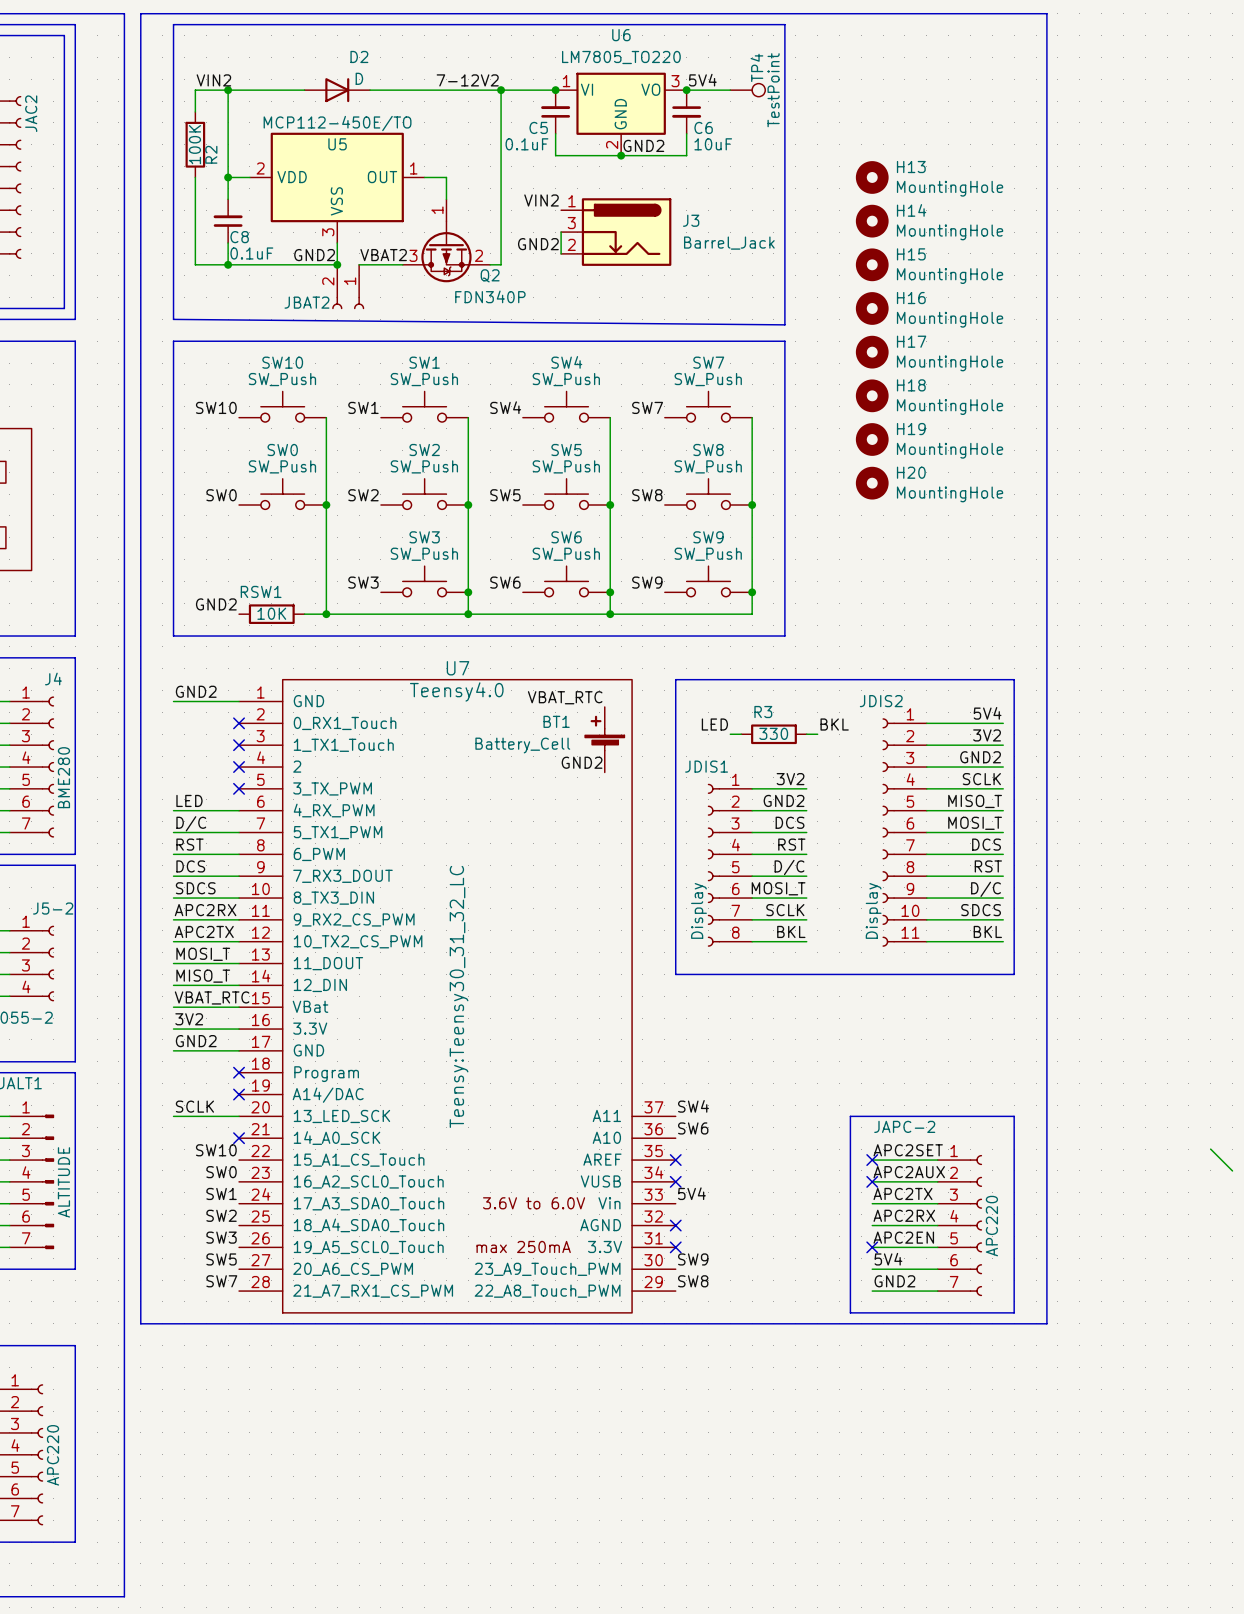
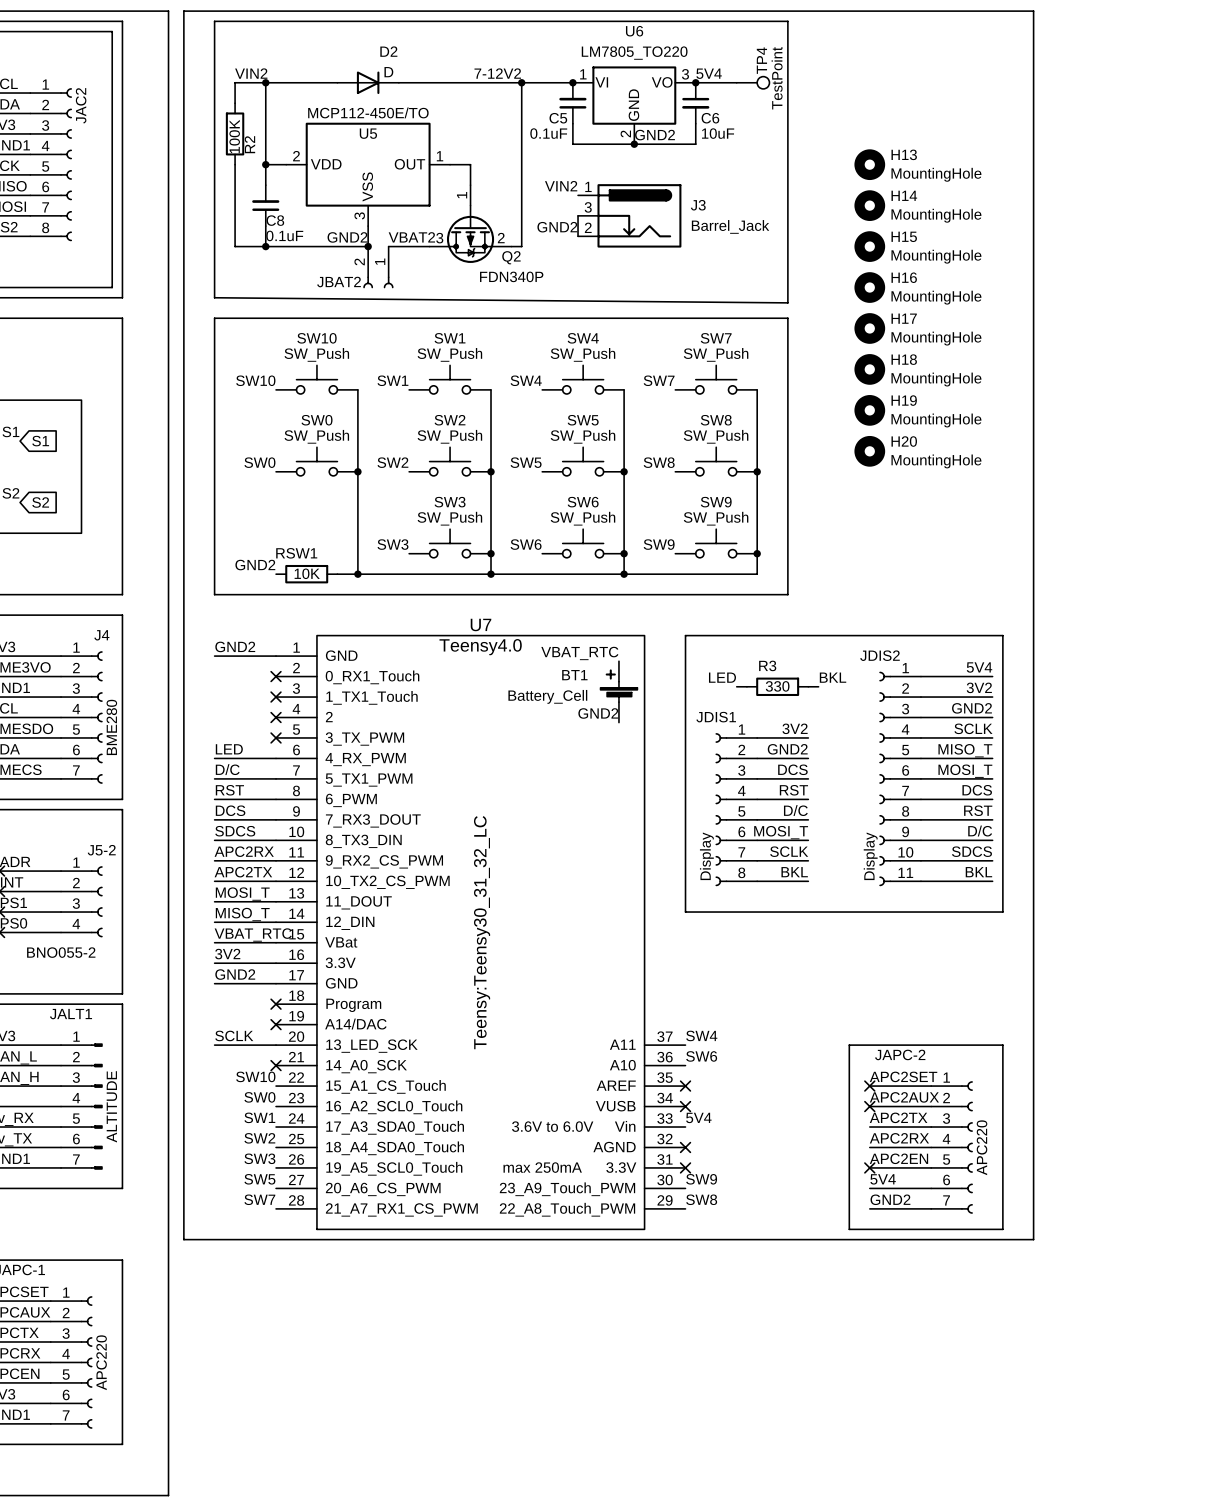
wire: (1210, 1149) (1232, 1170) -> none

